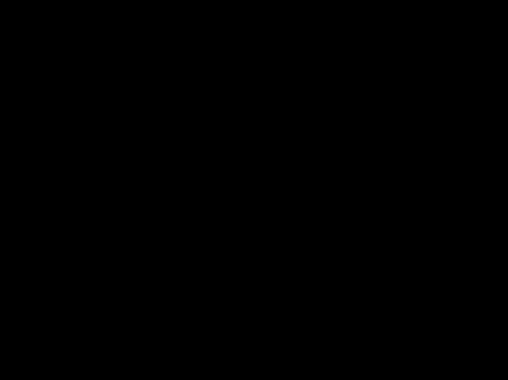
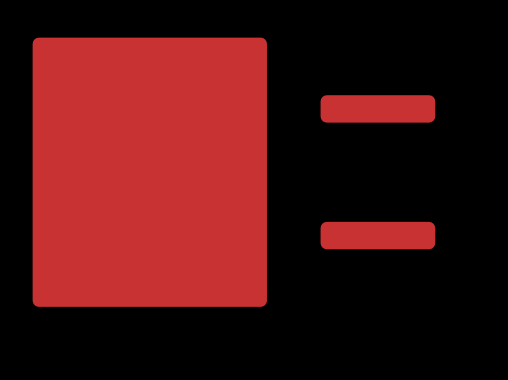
part: none -> (233, 172)

